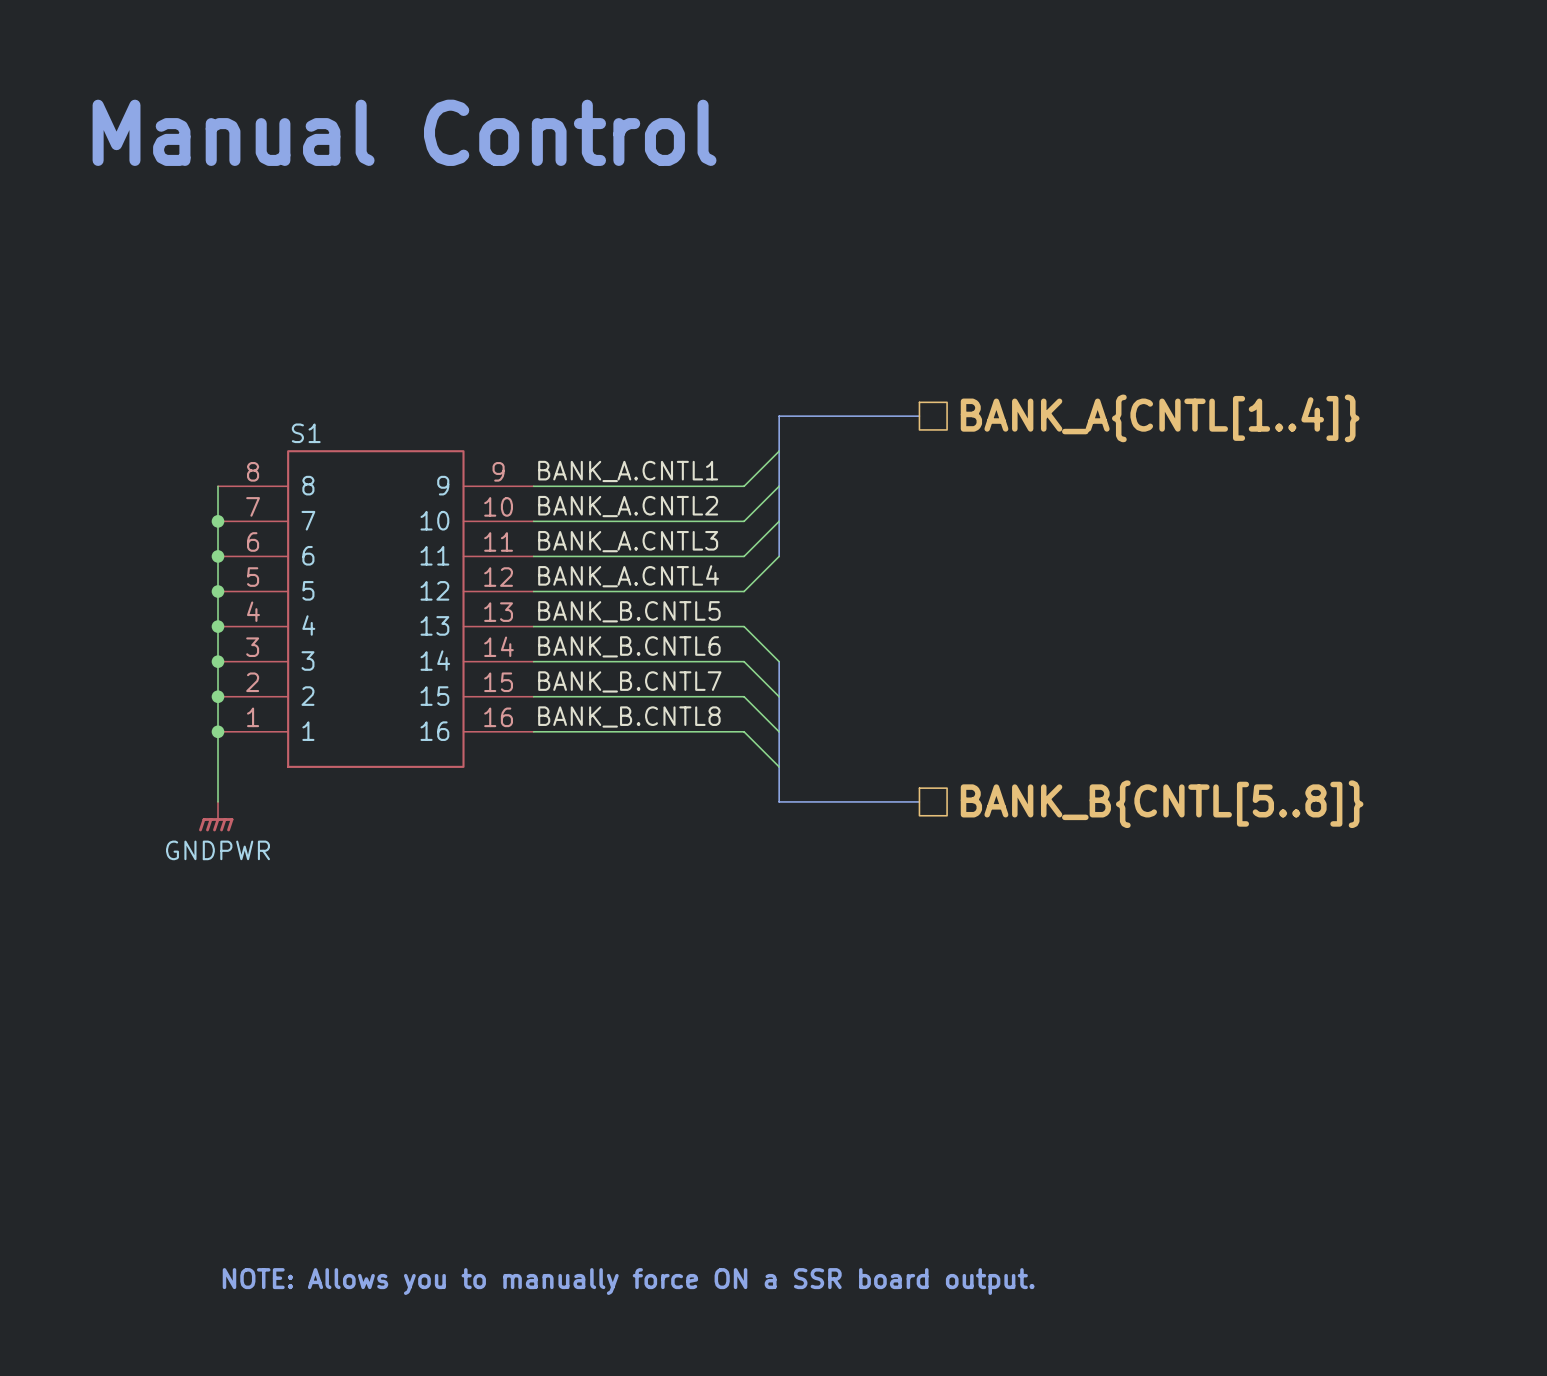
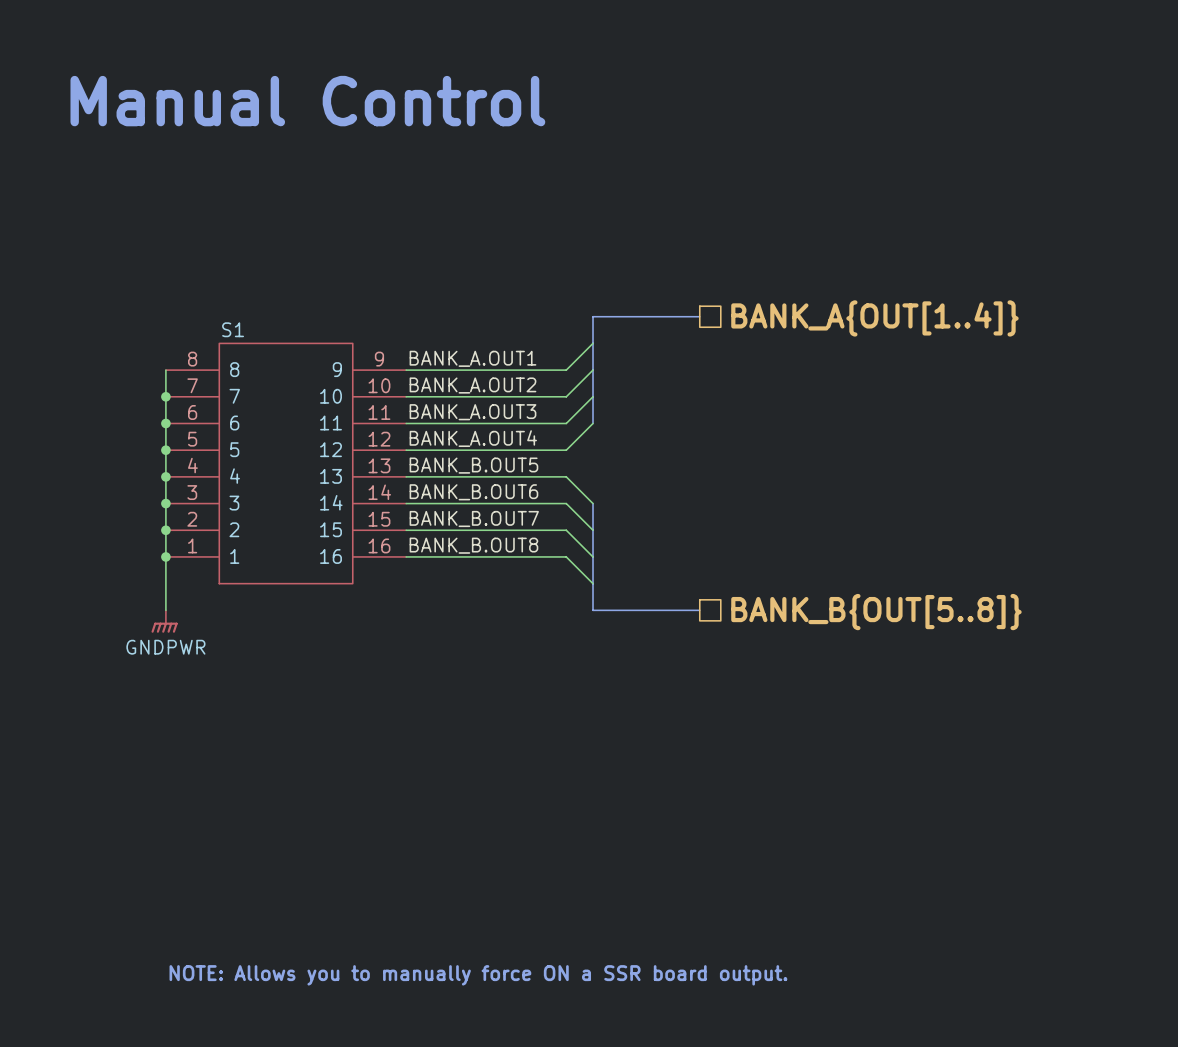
hierarchical label: BANK_A{CNTL[1..4]} (1160, 418) -> BANK_A{OUT[1..4]} (874, 318)
label: BANK_A.CNTL1 (628, 471) -> BANK_A.OUT1 (472, 358)
label: BANK_A.CNTL2 (628, 506) -> BANK_A.OUT2 (472, 385)
label: BANK_A.CNTL3 (628, 541) -> BANK_A.OUT3 (472, 412)
label: BANK_A.CNTL4 (628, 576) -> BANK_A.OUT4 (473, 438)
label: BANK_B.CNTL5 (629, 611) -> BANK_B.OUT5 (473, 465)
label: BANK_B.CNTL6 (629, 646) -> BANK_B.OUT6 (473, 492)
label: BANK_B.CNTL7 (629, 681) -> BANK_B.OUT7 (474, 518)
label: BANK_B.CNTL8 (629, 716) -> BANK_B.OUT8 (473, 545)
hierarchical label: BANK_B{CNTL[5..8]} (1162, 804) -> BANK_B{OUT[5..8]} (876, 612)

